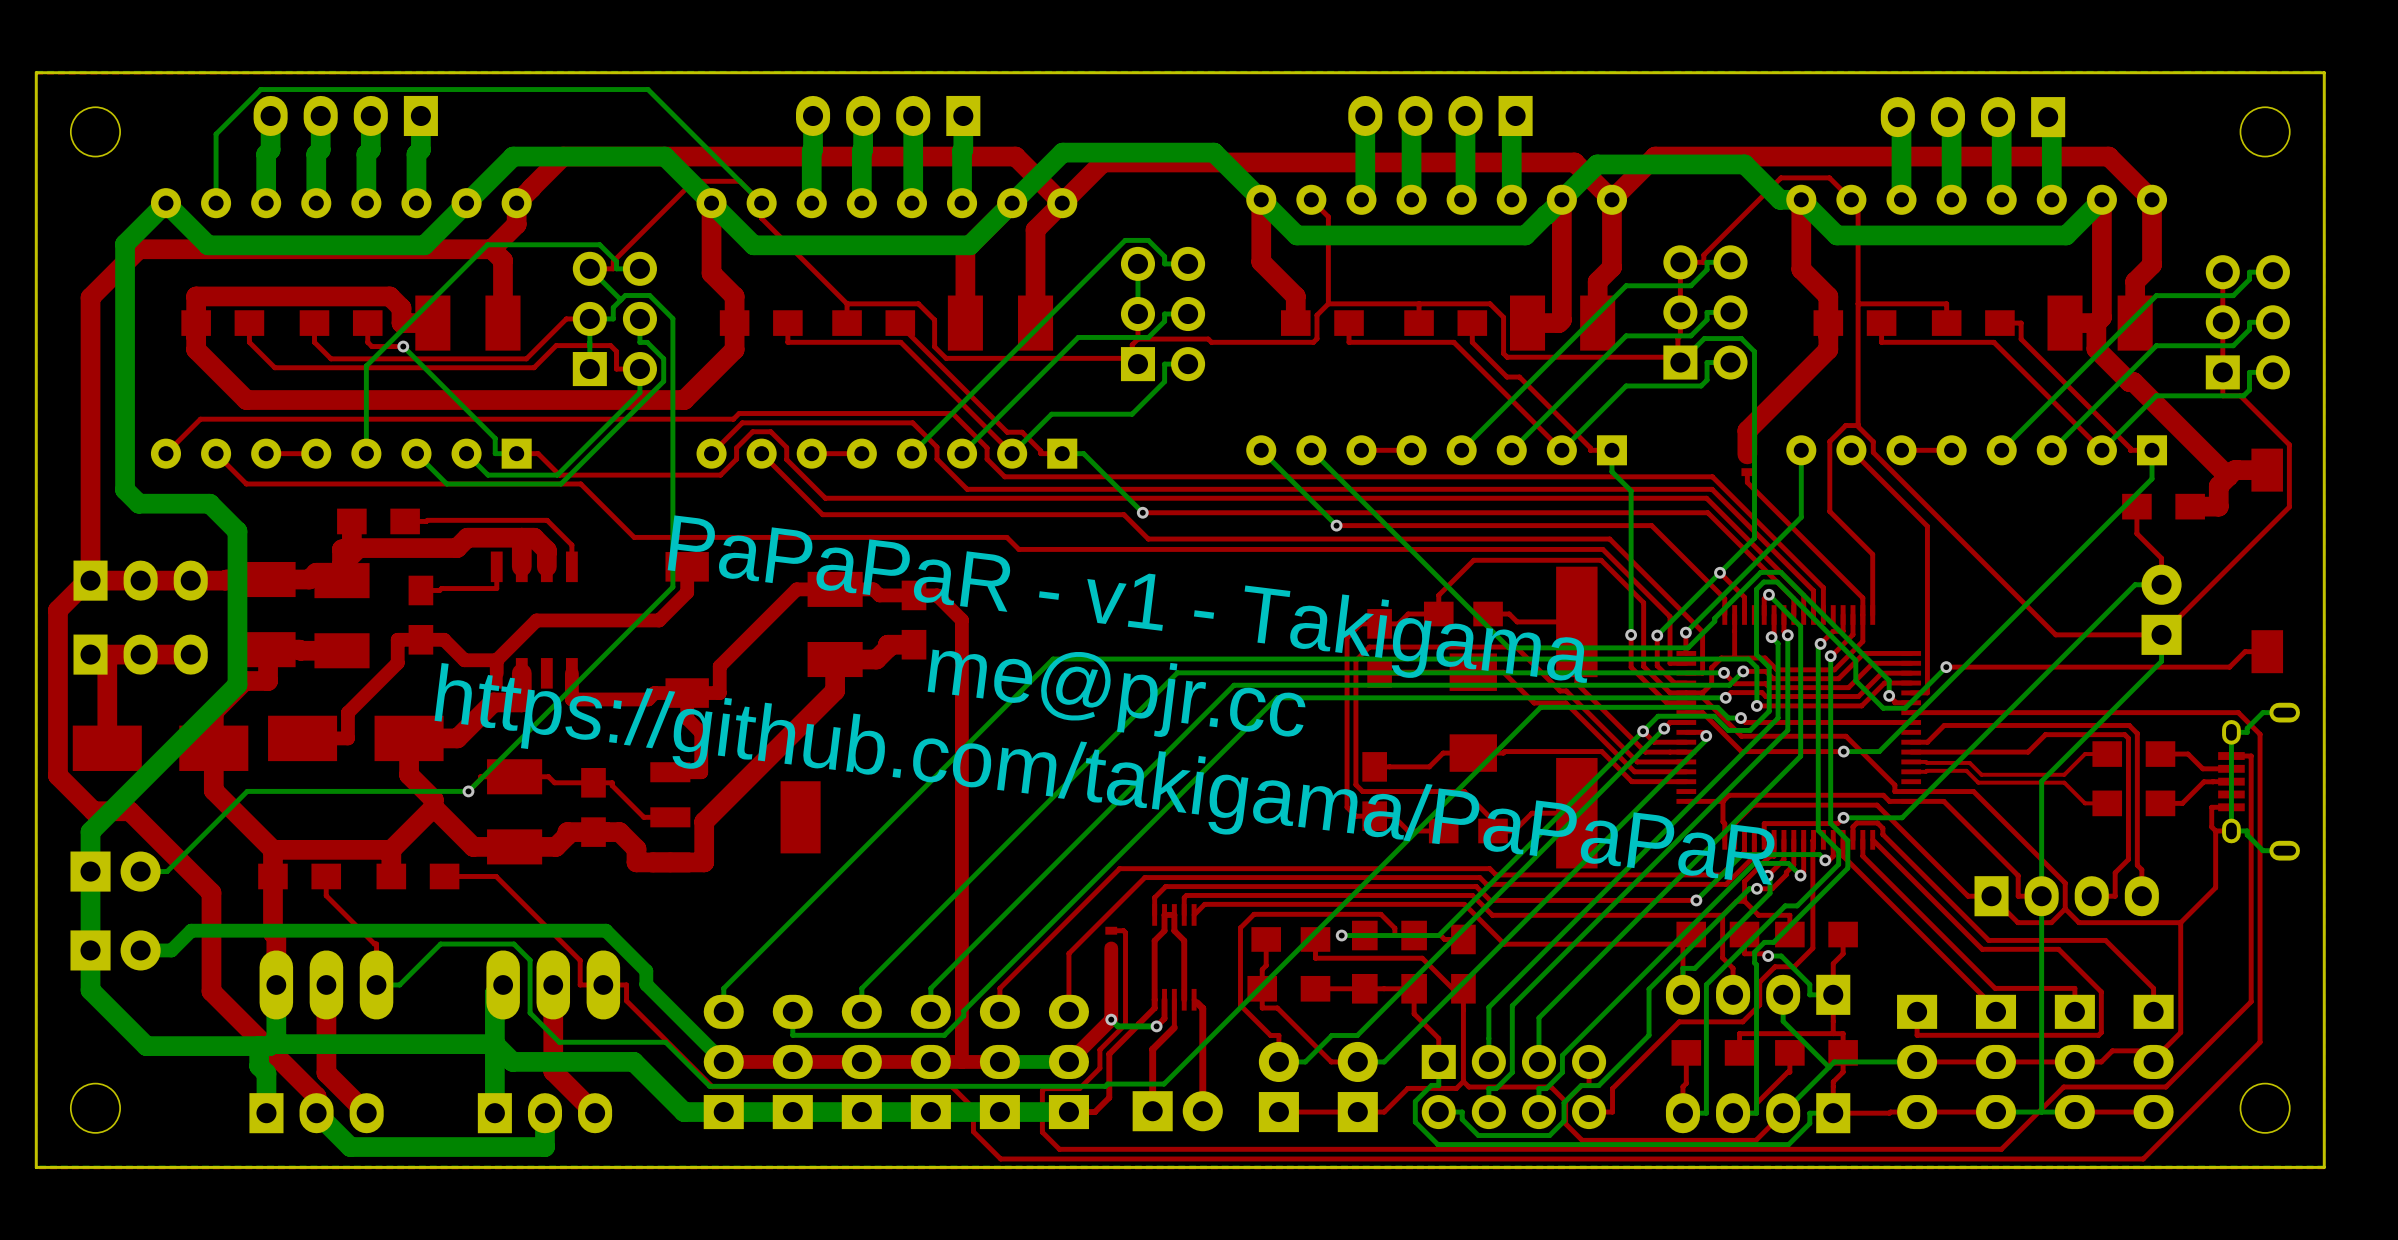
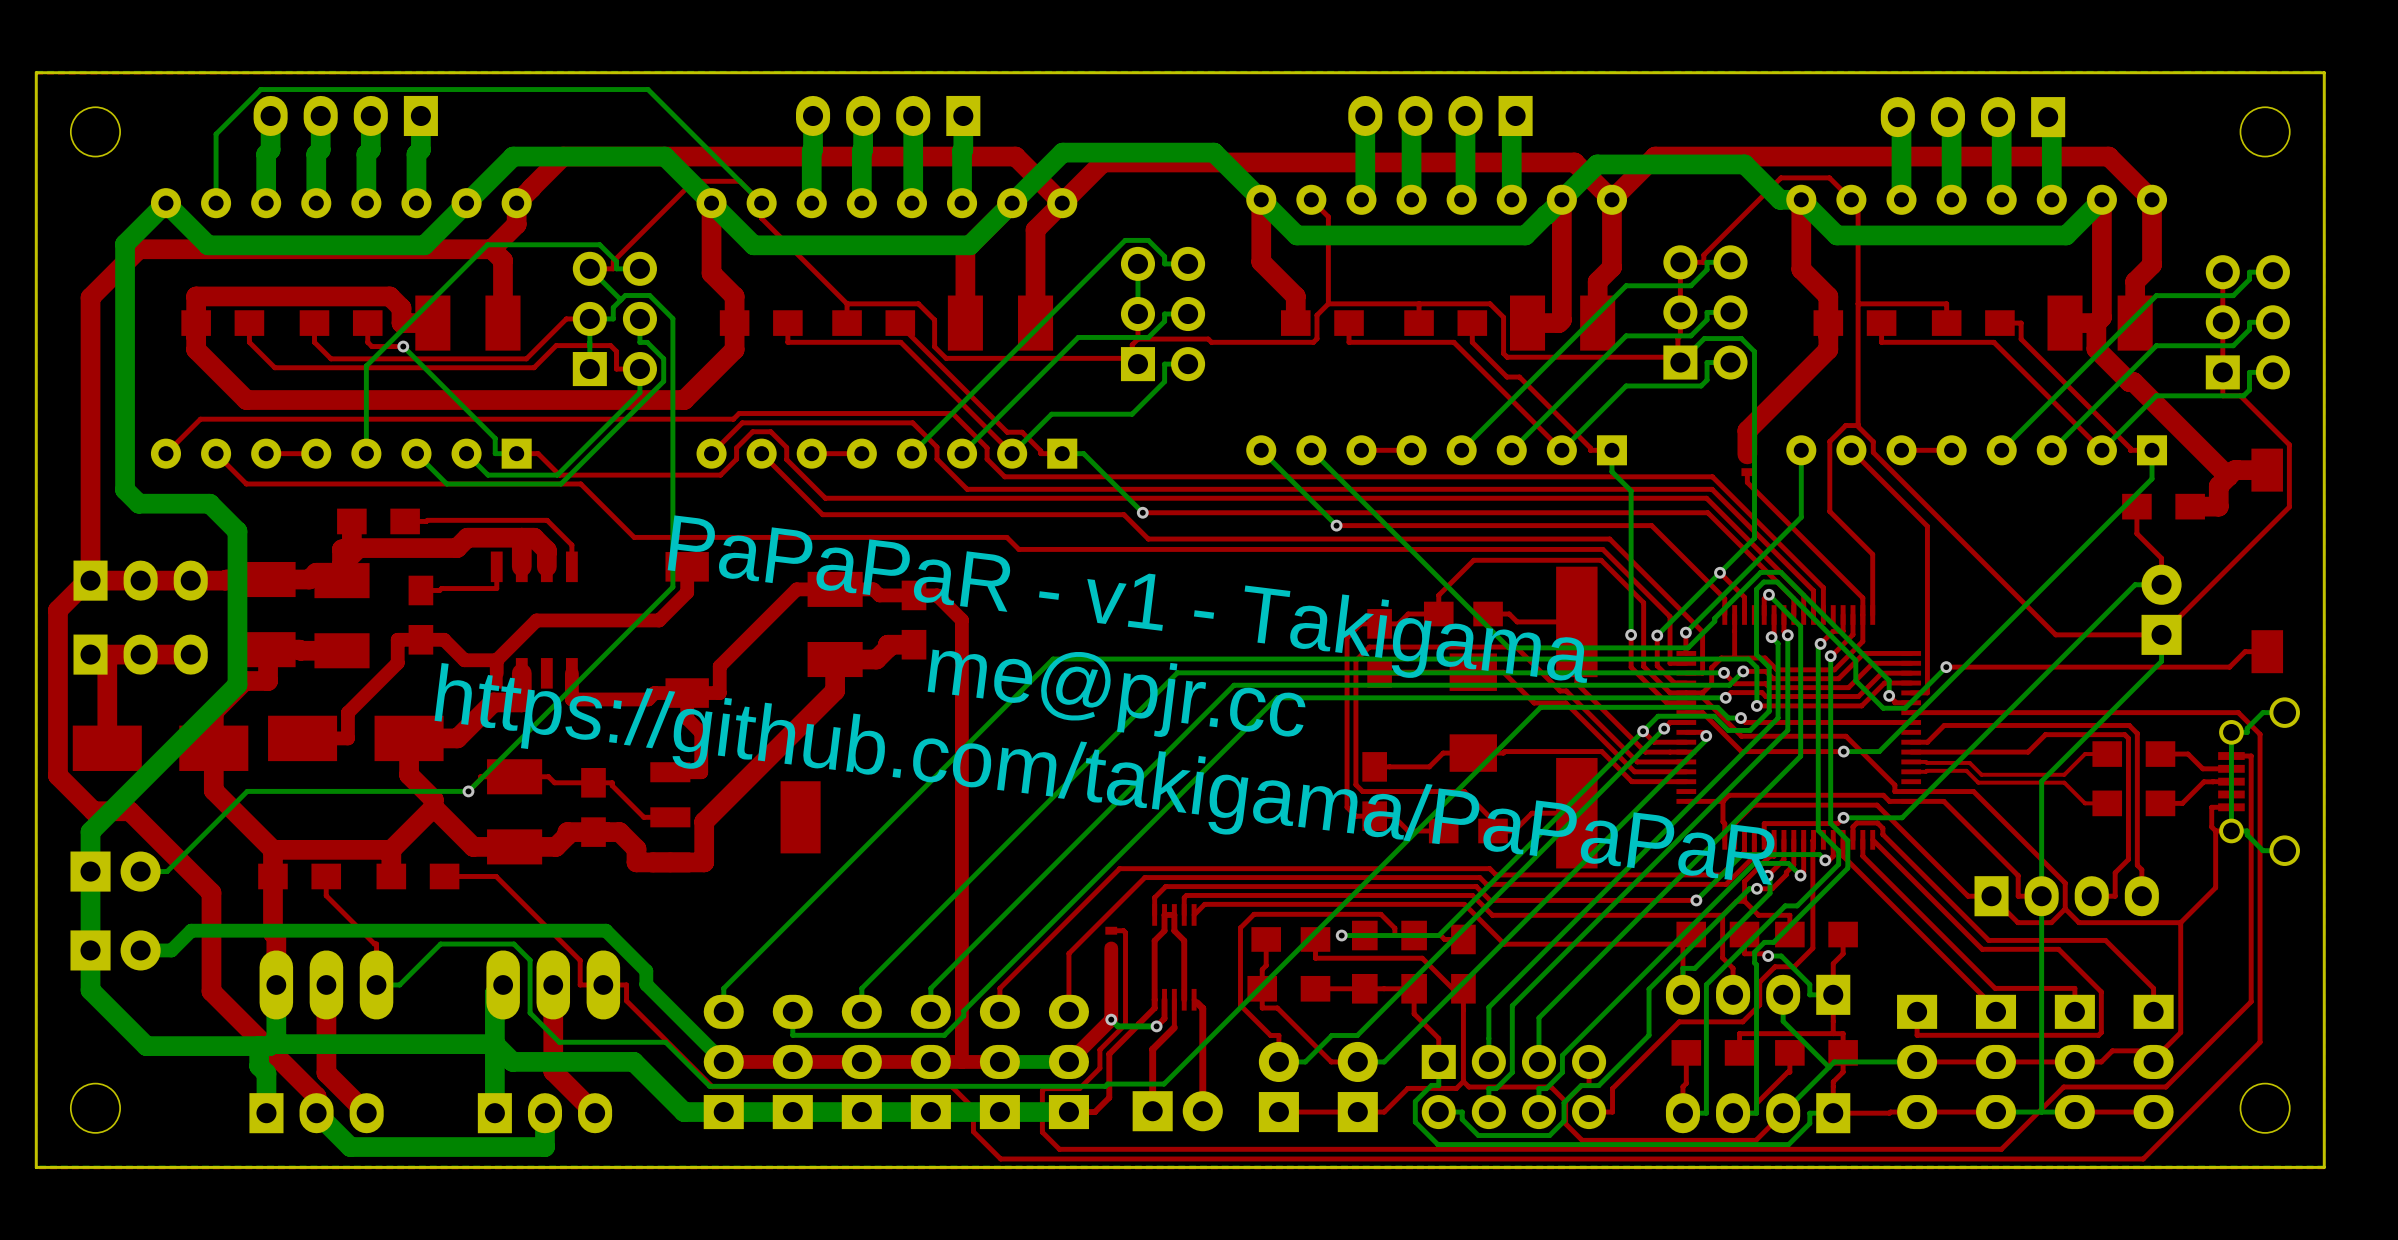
part footprint: [2218, 702, 2300, 861] -> [2218, 697, 2300, 866]

